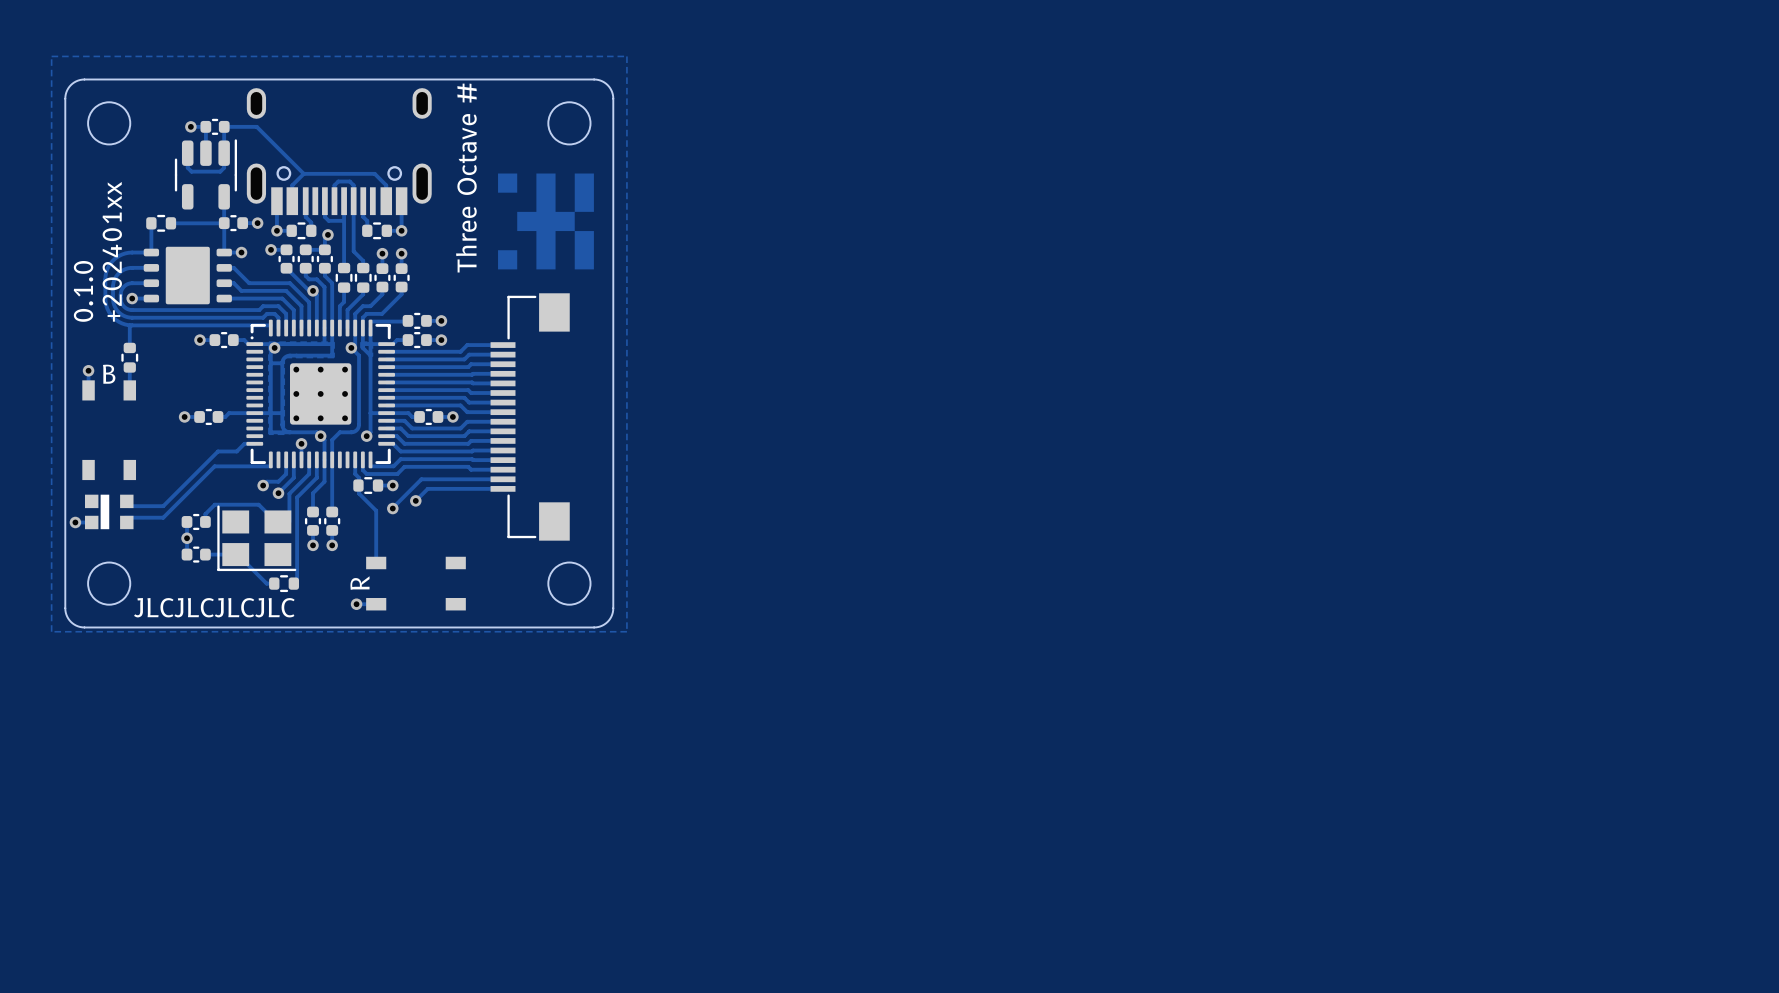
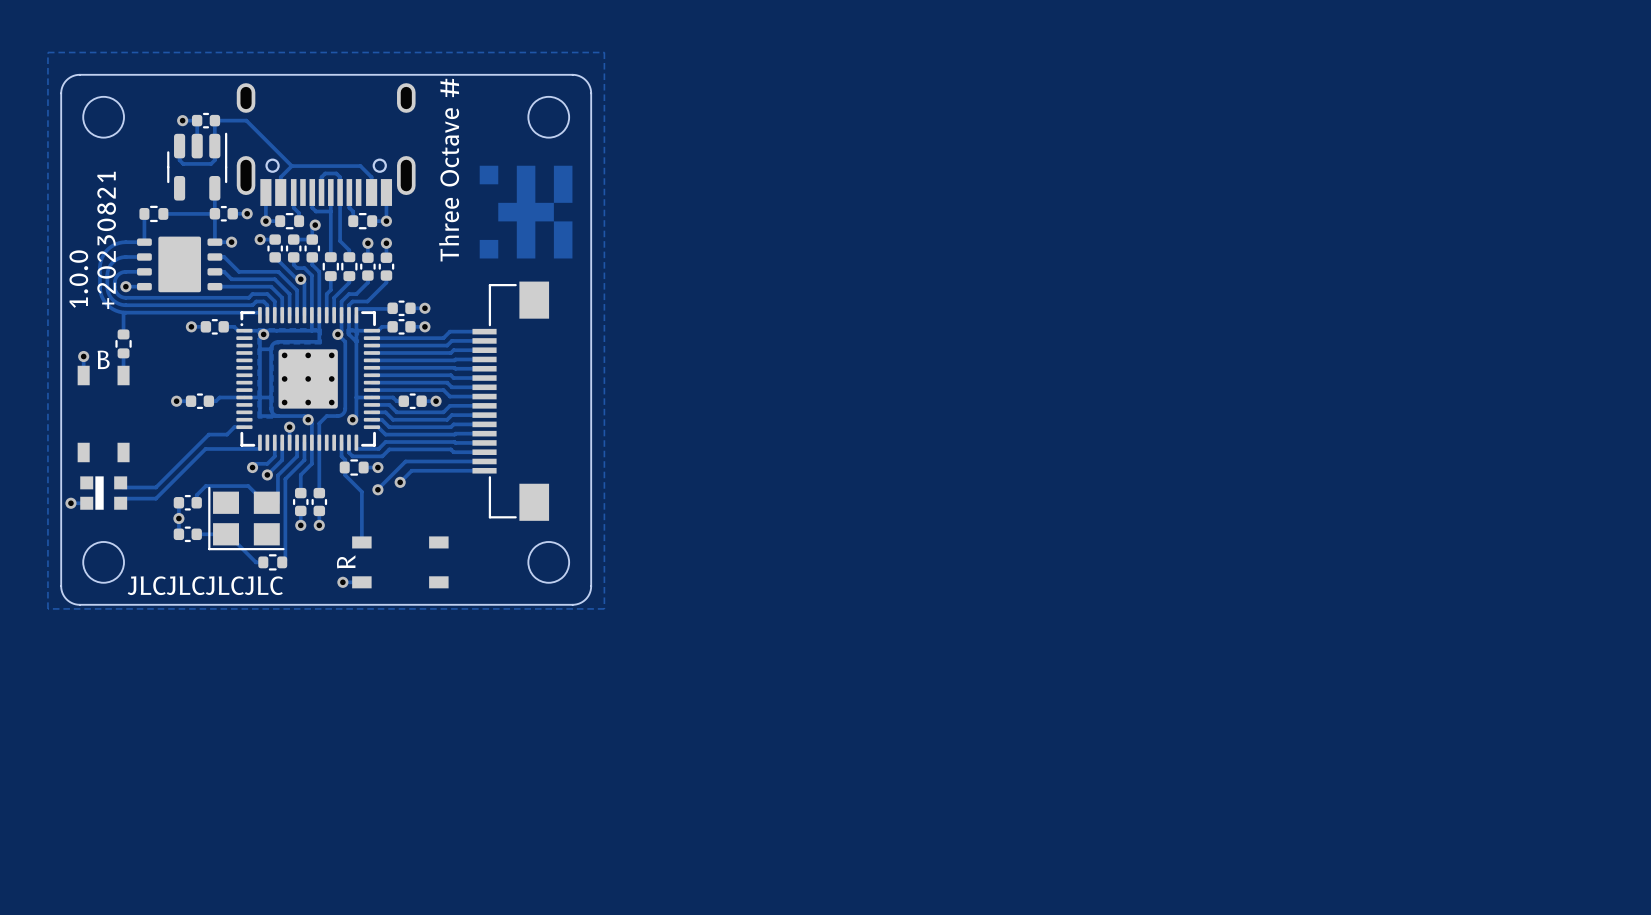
text: +202401xx (112, 251) -> +20230821 (106, 240)
text: 0.1.0 (83, 291) -> 1.0.0 (78, 279)

